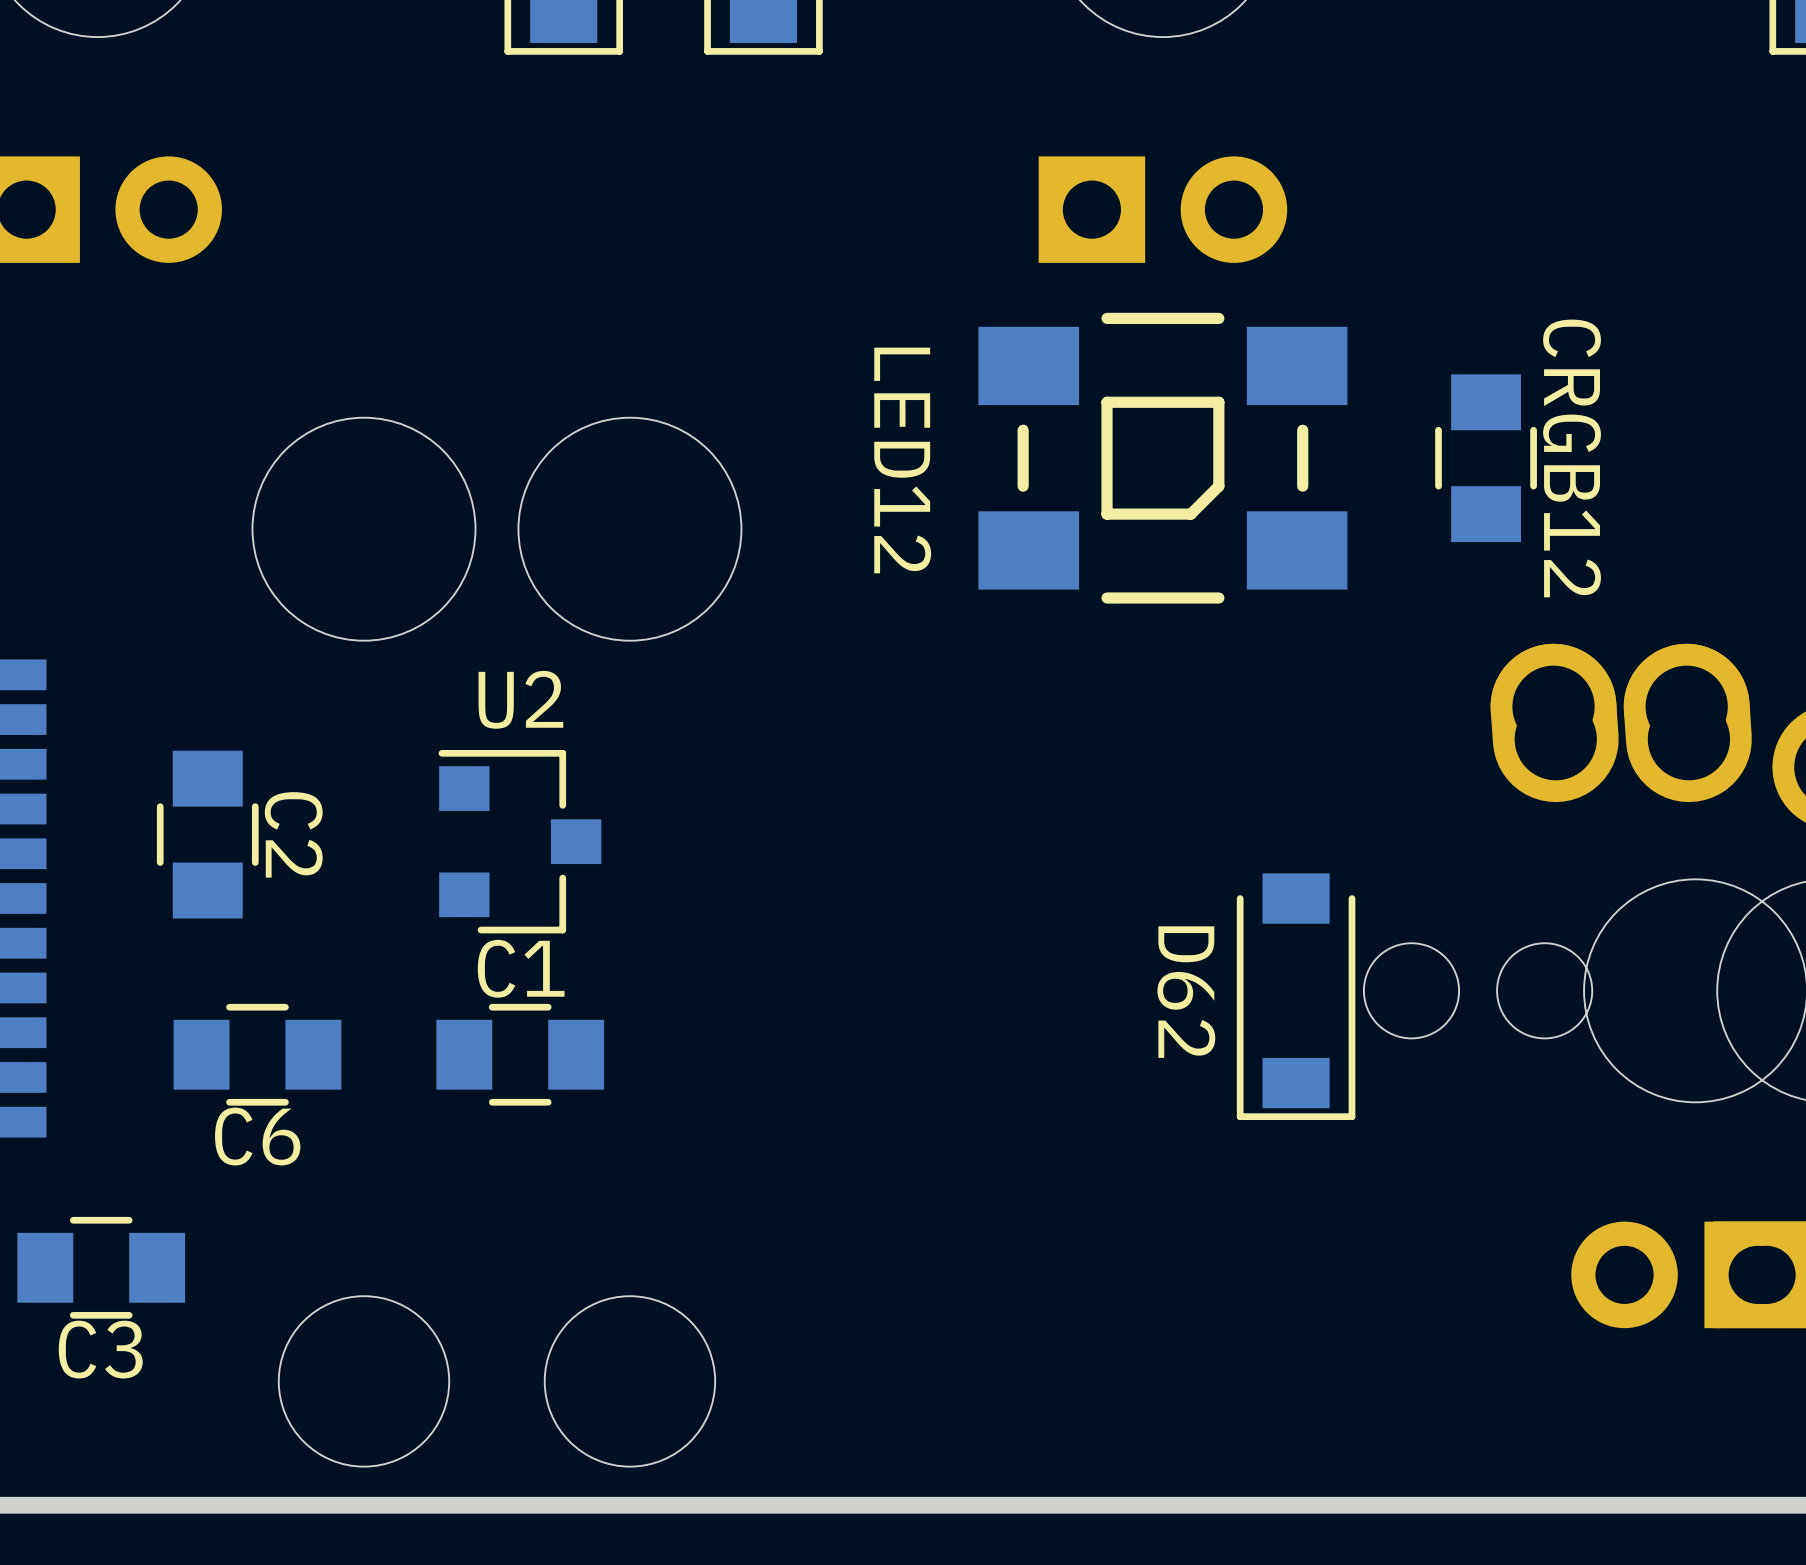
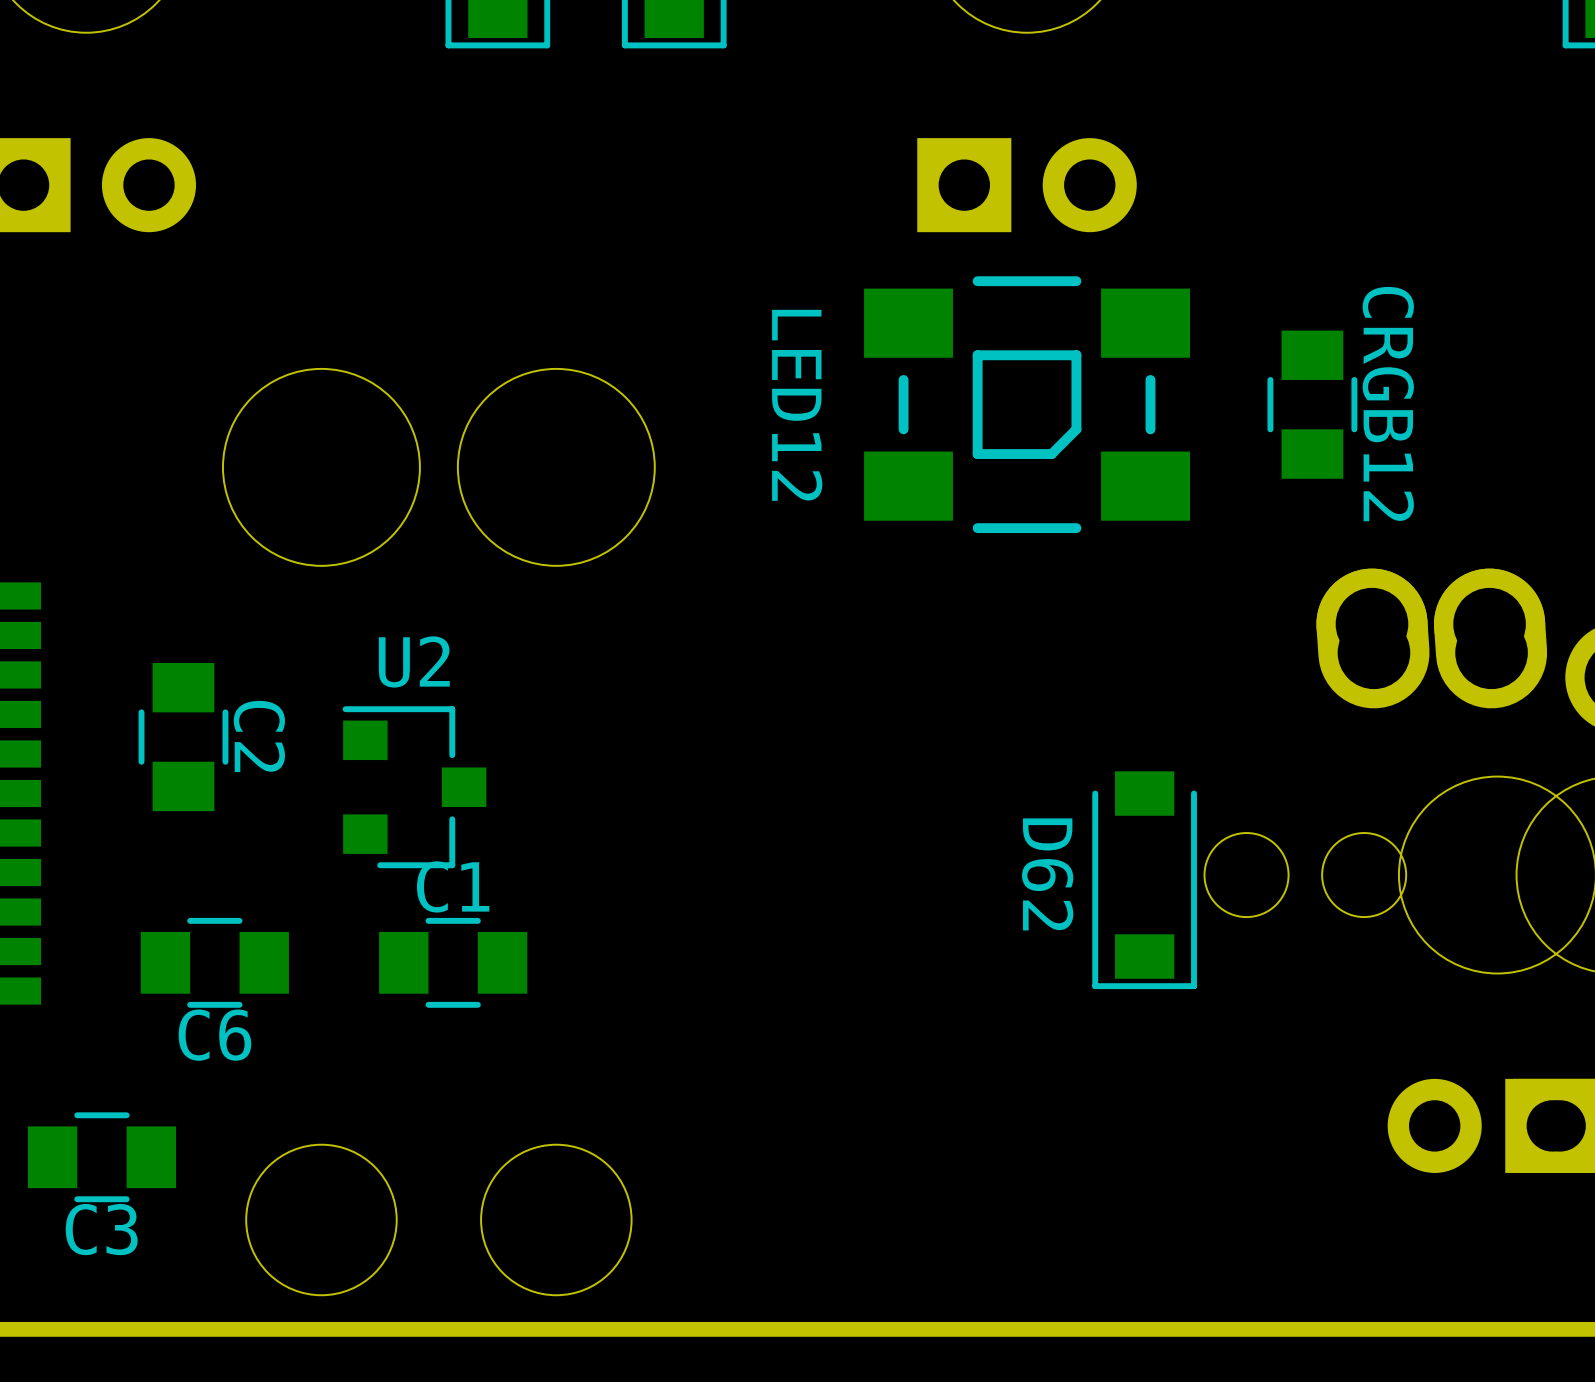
U2 position: (519, 841) -> (414, 787)
C6 position: (257, 1054) -> (214, 962)
C1 position: (520, 1054) -> (453, 962)
C3 position: (101, 1267) -> (101, 1157)

